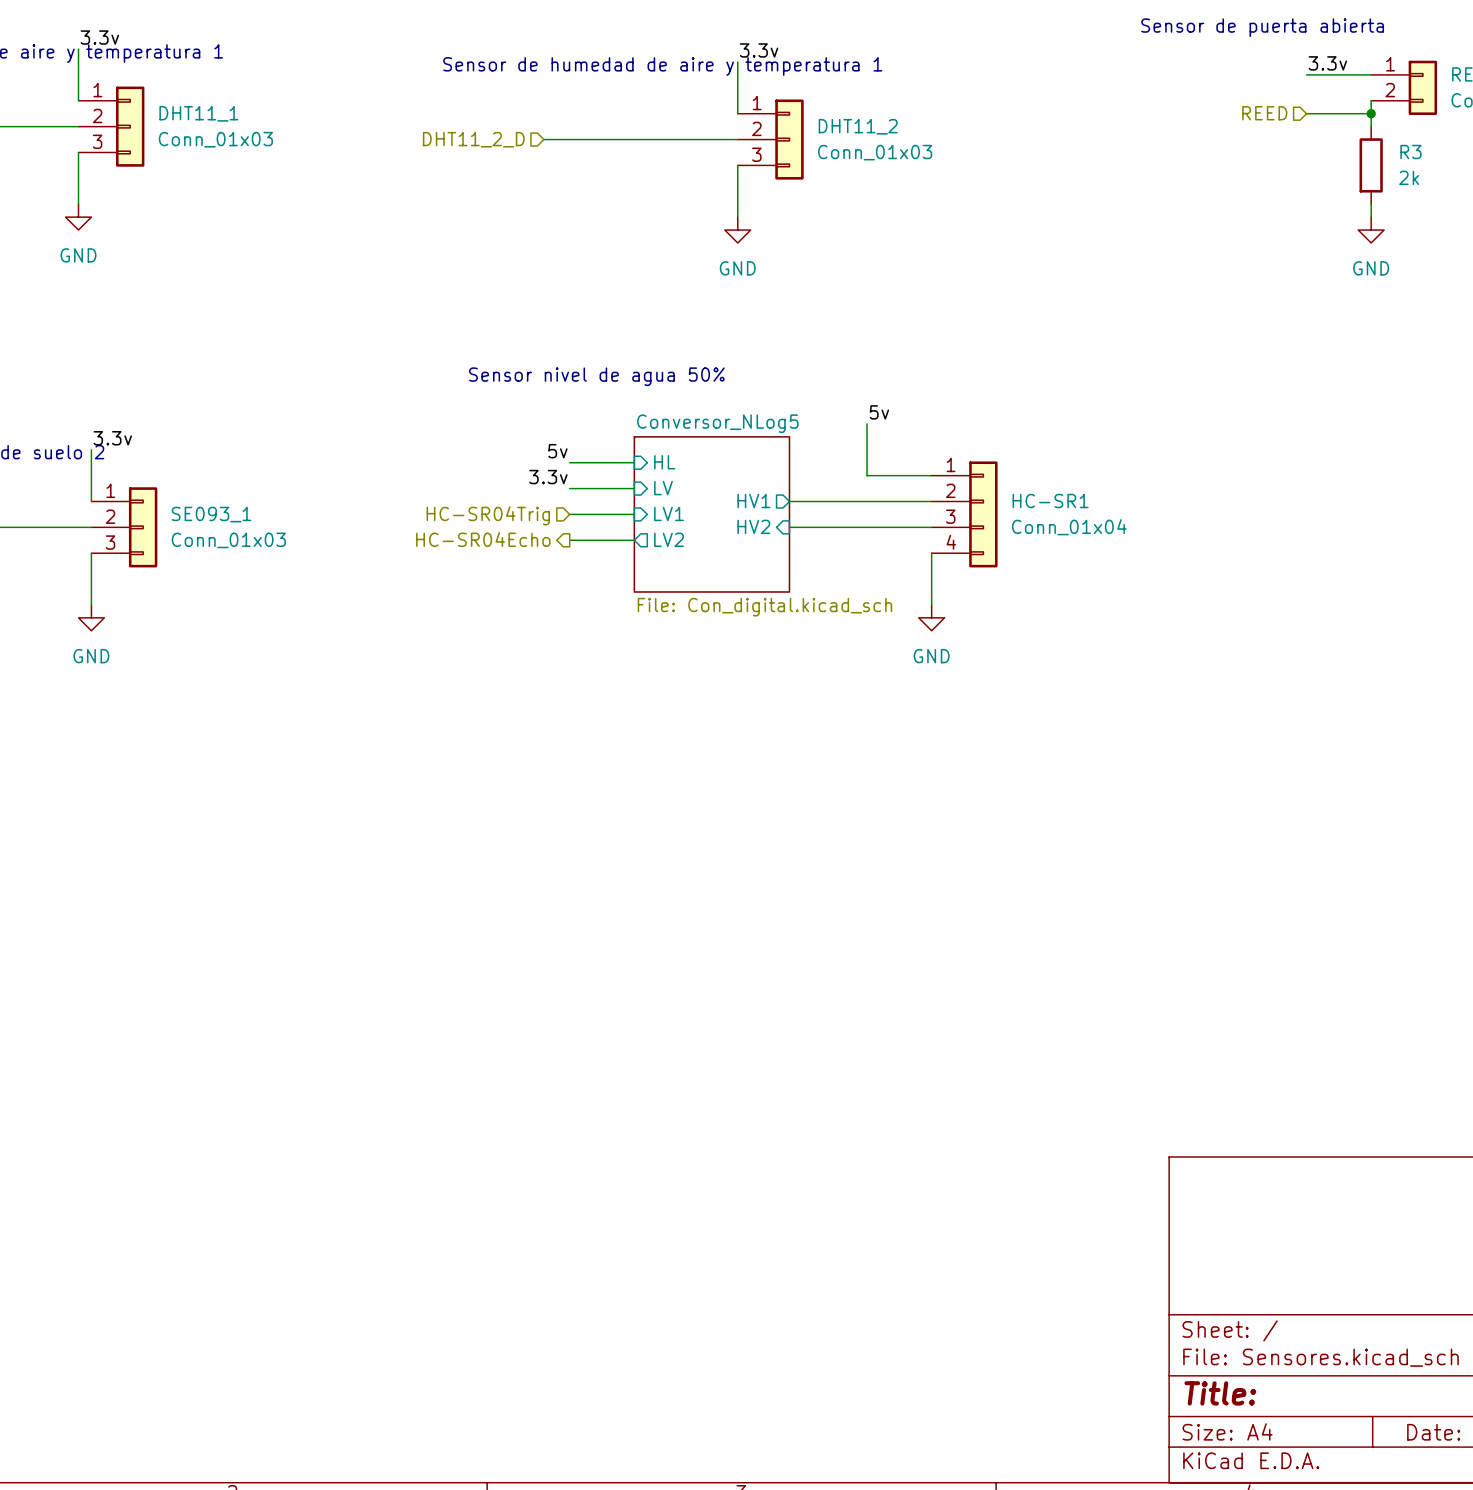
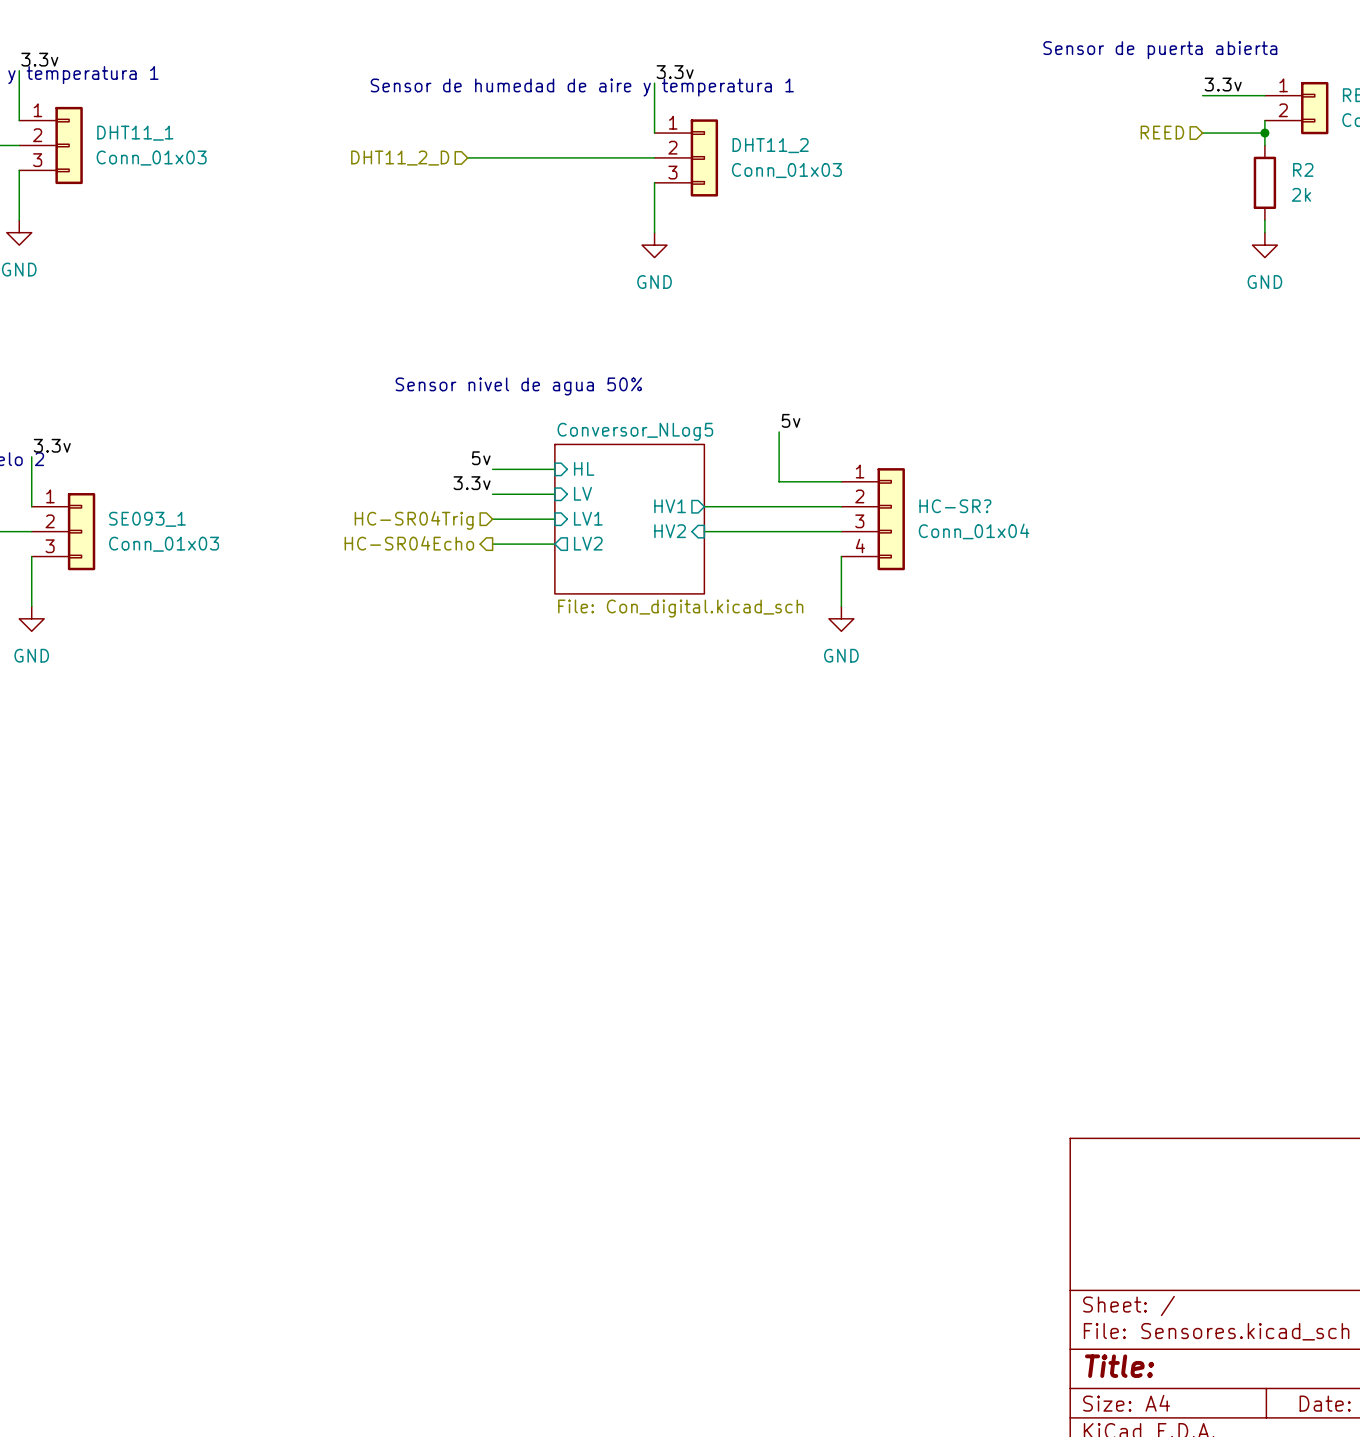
R3 name: R3 (1410, 152) -> R2 (1303, 169)
HC-SR1 name: HC-SR1 (1050, 501) -> HC-SR? (955, 506)

